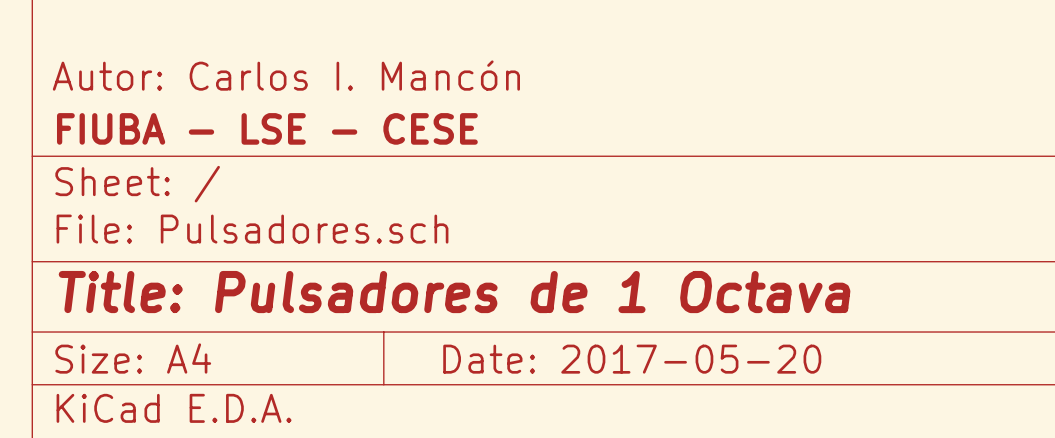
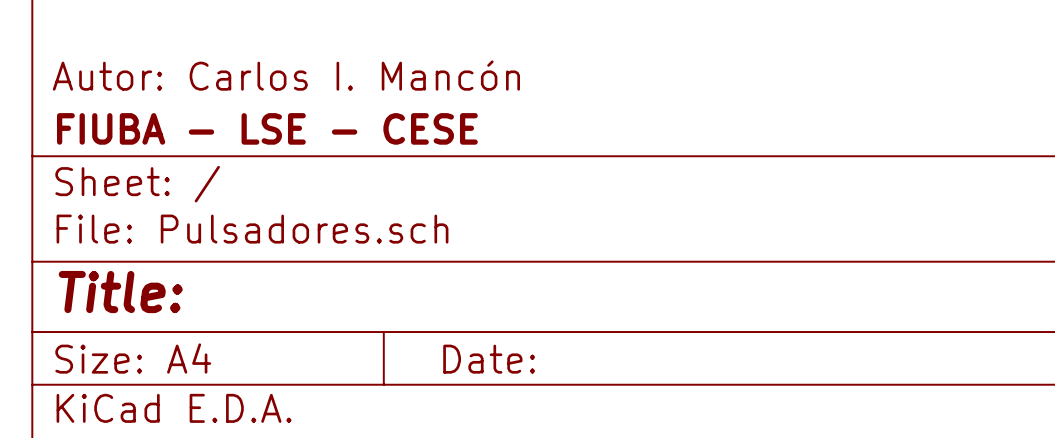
title block: Title: Pulsadores de 1 Octava (454, 292) -> Title: (120, 292)
title block: Date: 2017-05-20 (632, 359) -> Date: (489, 359)

